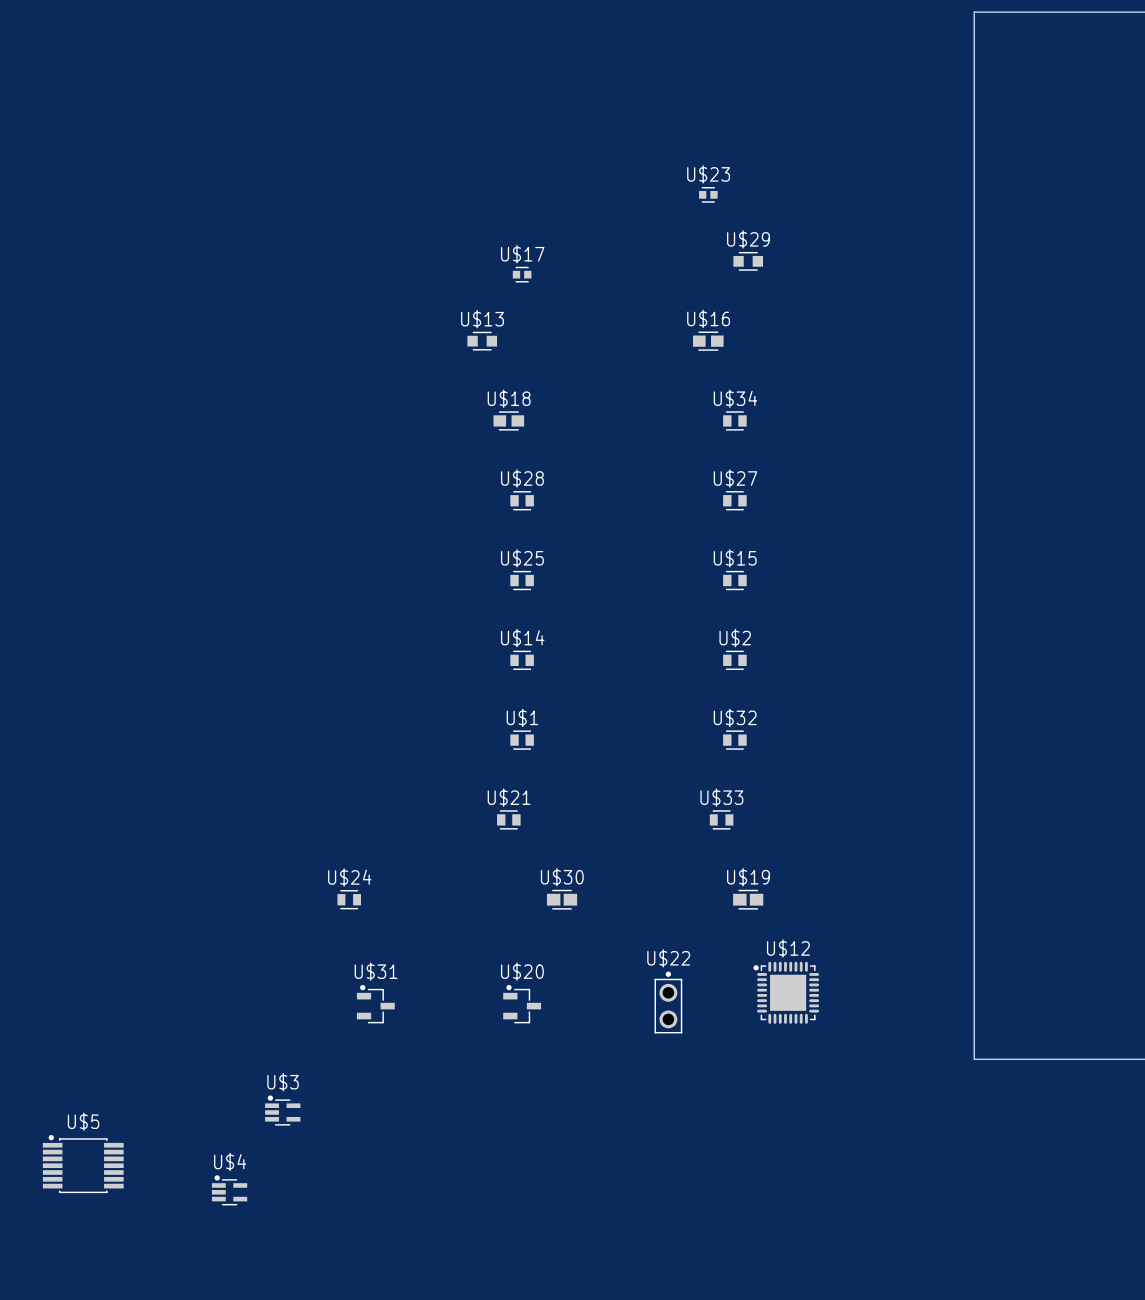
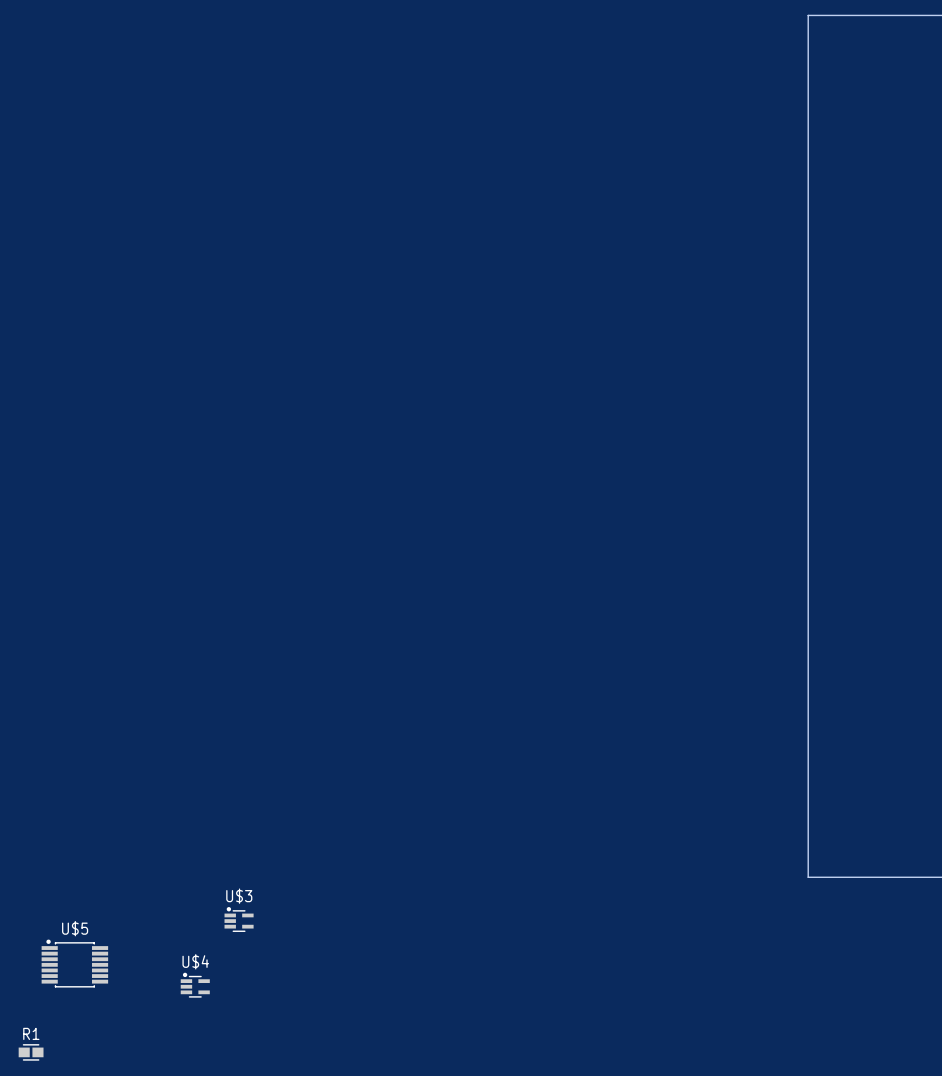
U$23: (708, 194) -> none
U$29: (748, 261) -> none
U$17: (522, 274) -> none
U$13: (482, 341) -> none
U$16: (708, 341) -> none
U$18: (508, 420) -> none
U$34: (734, 420) -> none
U$28: (522, 500) -> none
U$27: (734, 500) -> none
U$25: (522, 580) -> none
U$15: (734, 580) -> none
U$14: (522, 660) -> none
U$2: (734, 660) -> none
U$1: (522, 740) -> none
U$32: (734, 740) -> none
U$21: (508, 819) -> none
U$33: (721, 819) -> none
U$24: (349, 899) -> none
U$30: (562, 899) -> none
U$19: (748, 899) -> none
U$12: (786, 992) -> none
U$22: (668, 1002) -> none
U$31: (375, 1004) -> none
U$20: (522, 1004) -> none
R1: none -> (31, 1052)

